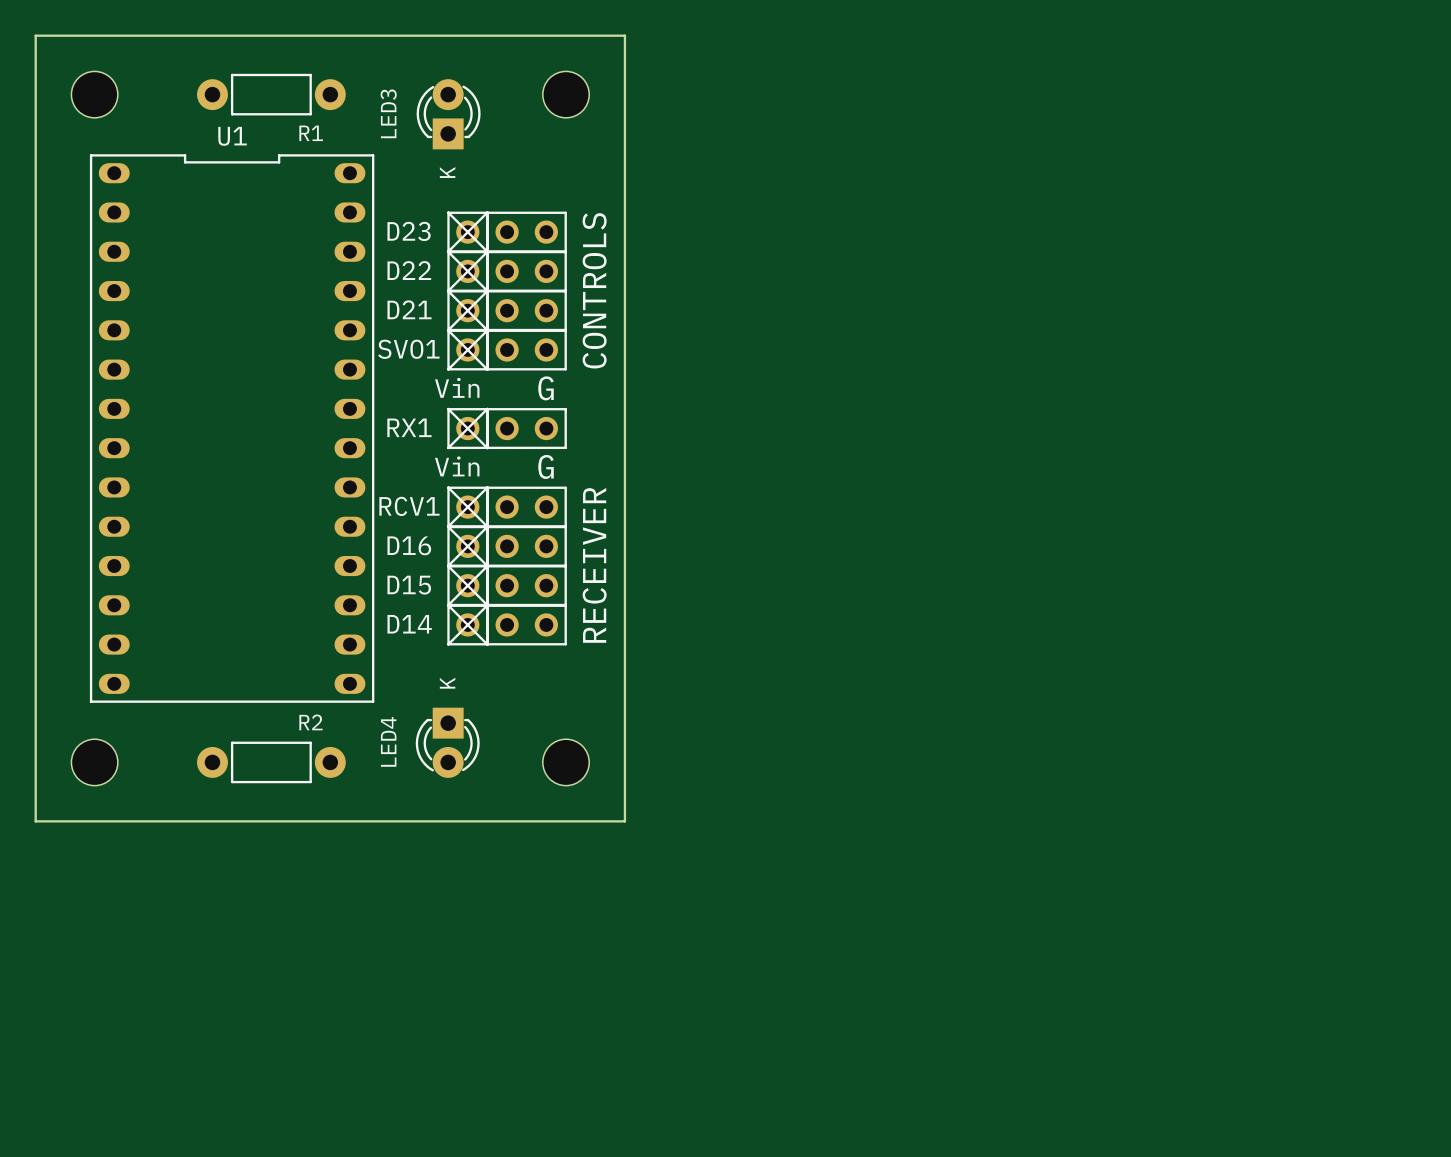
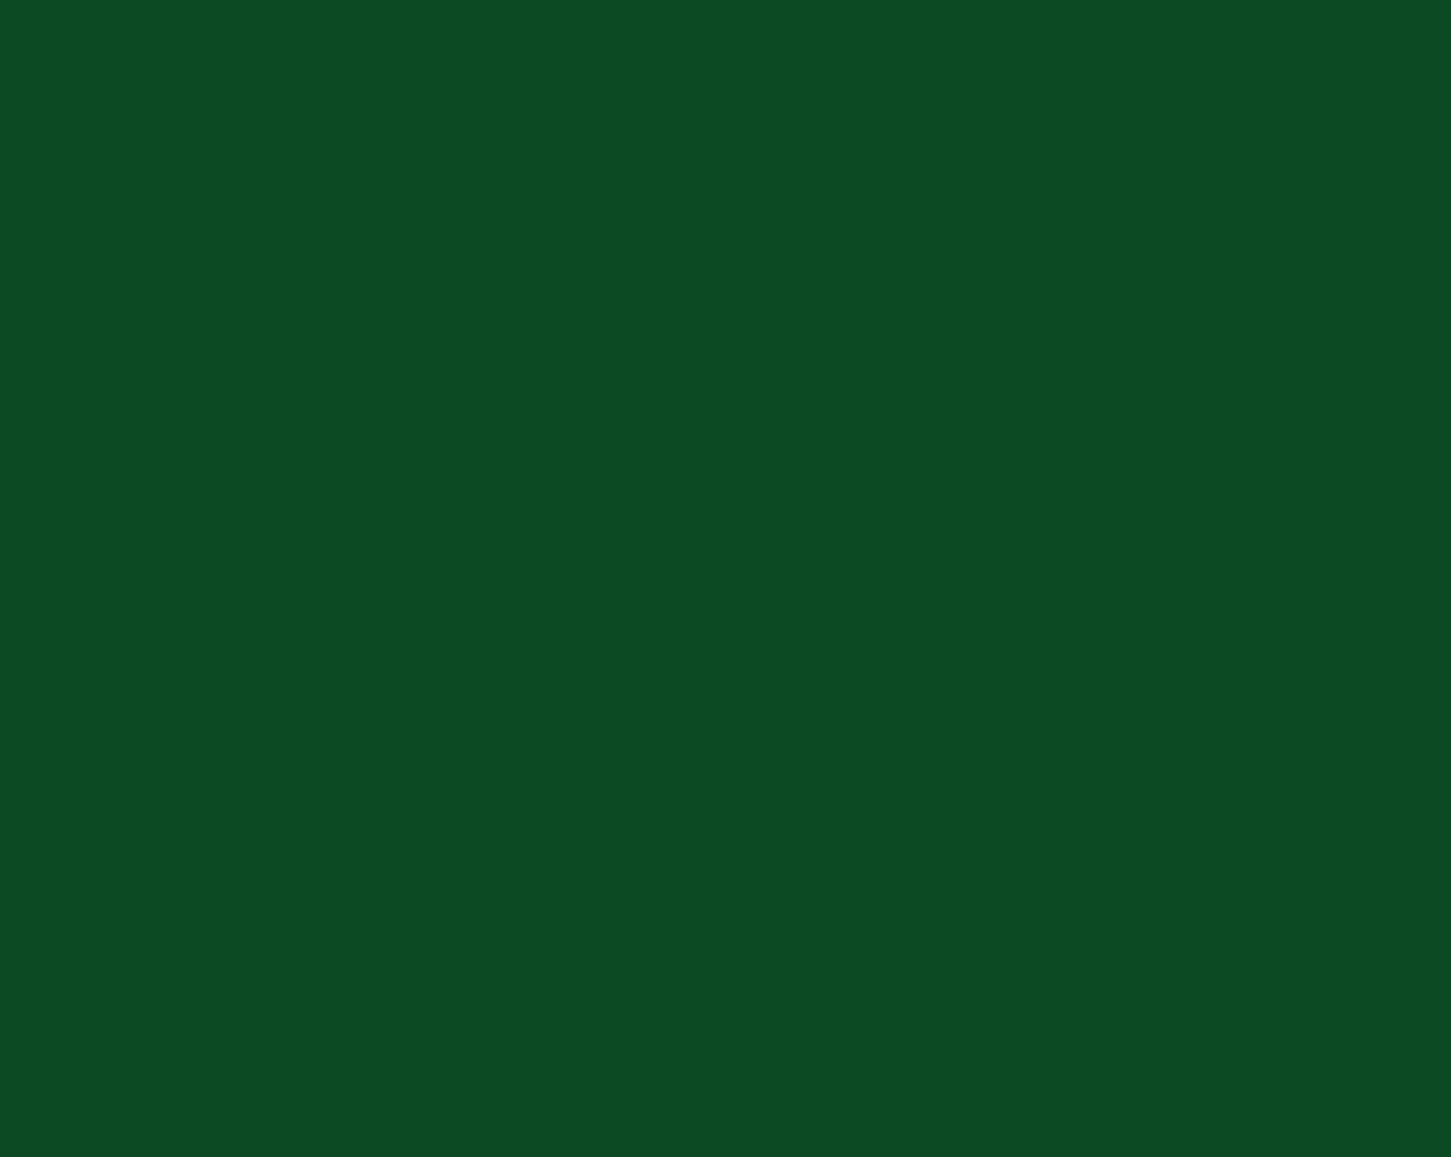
board edge: (35, 35) (35, 821) (624, 821) (624, 35) (35, 35) -> none
part: (94, 94) -> none
R1: (271, 94) -> none
part: (566, 94) -> none
LED3: (448, 114) -> none
D23: (506, 232) -> none
D22: (506, 271) -> none
text: CONTROLS (594, 290) -> none
D21: (506, 310) -> none
SVO1: (506, 349) -> none
text: Vin (457, 387) -> none
text: G (546, 388) -> none
U1: (232, 428) -> none
RX1: (506, 428) -> none
text: Vin (457, 466) -> none
text: G (546, 466) -> none
RCV1: (506, 507) -> none
D16: (506, 546) -> none
text: RECEIVER (594, 565) -> none
D15: (506, 585) -> none
D14: (506, 624) -> none
LED4: (447, 742) -> none
part: (94, 762) -> none
R2: (271, 762) -> none
part: (566, 762) -> none

